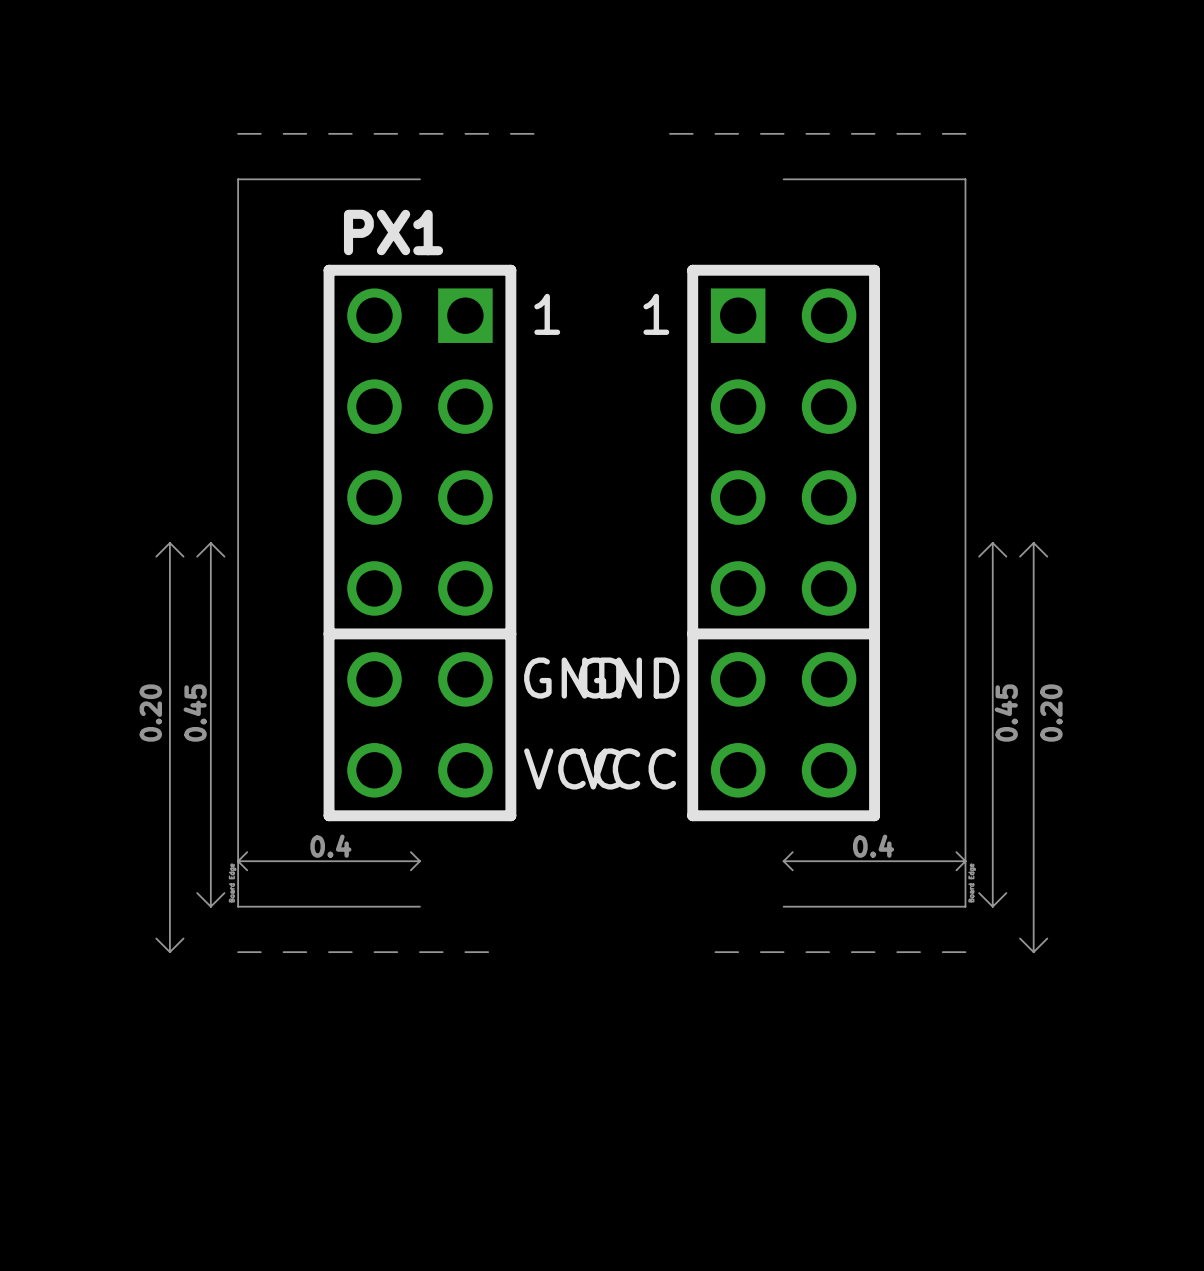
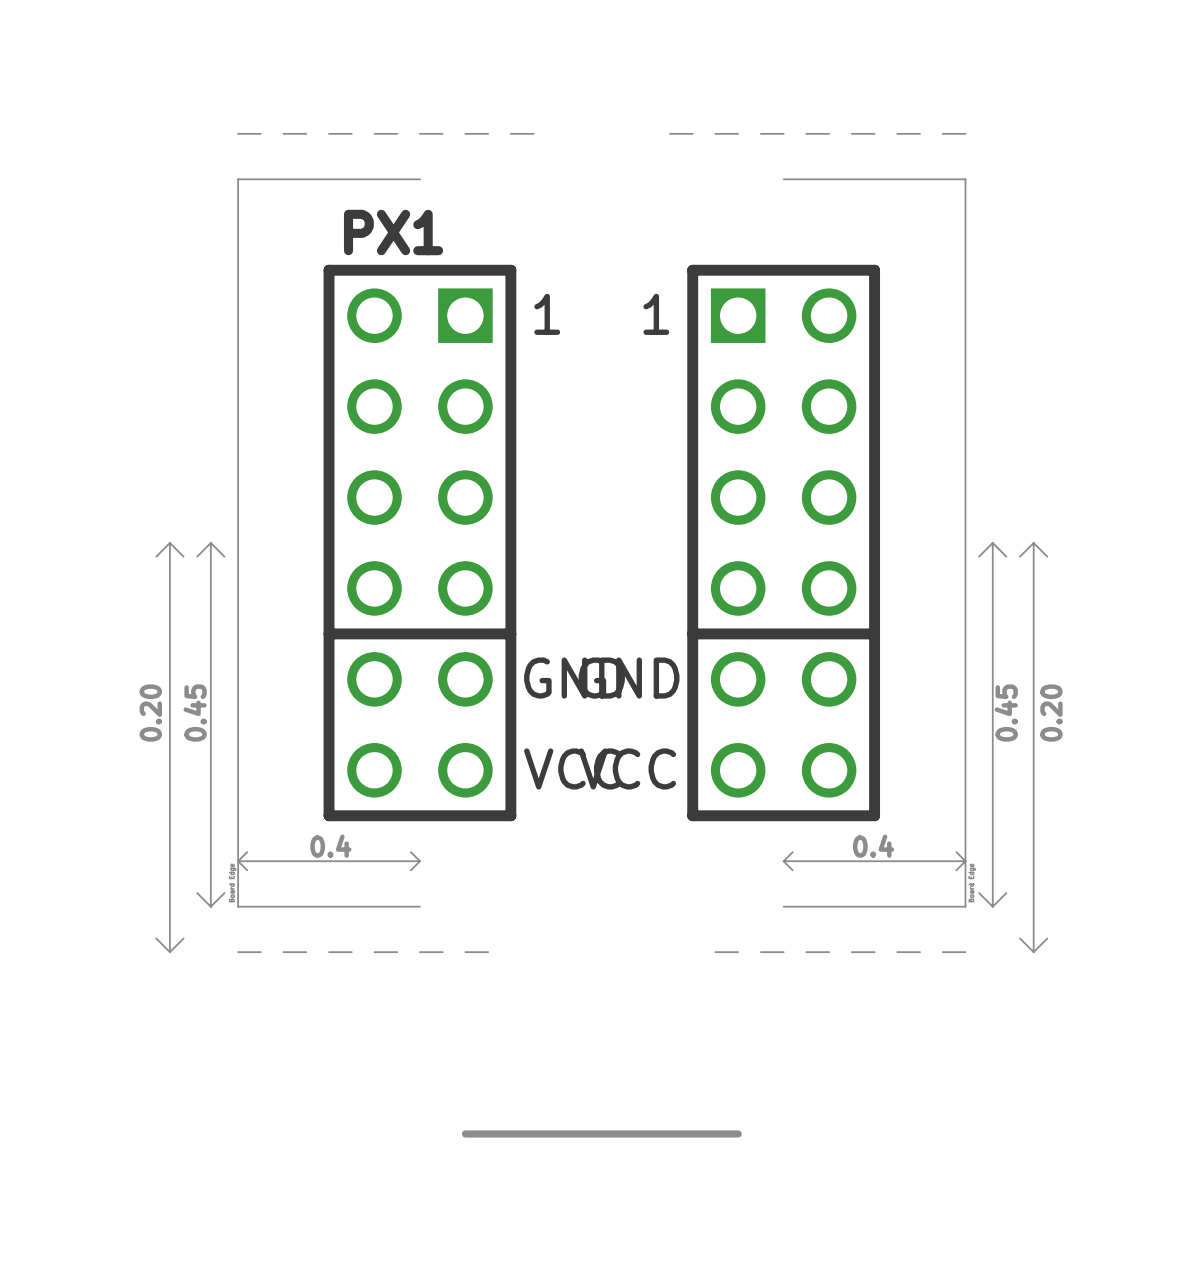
line: none -> (465, 1133) (738, 1133)

